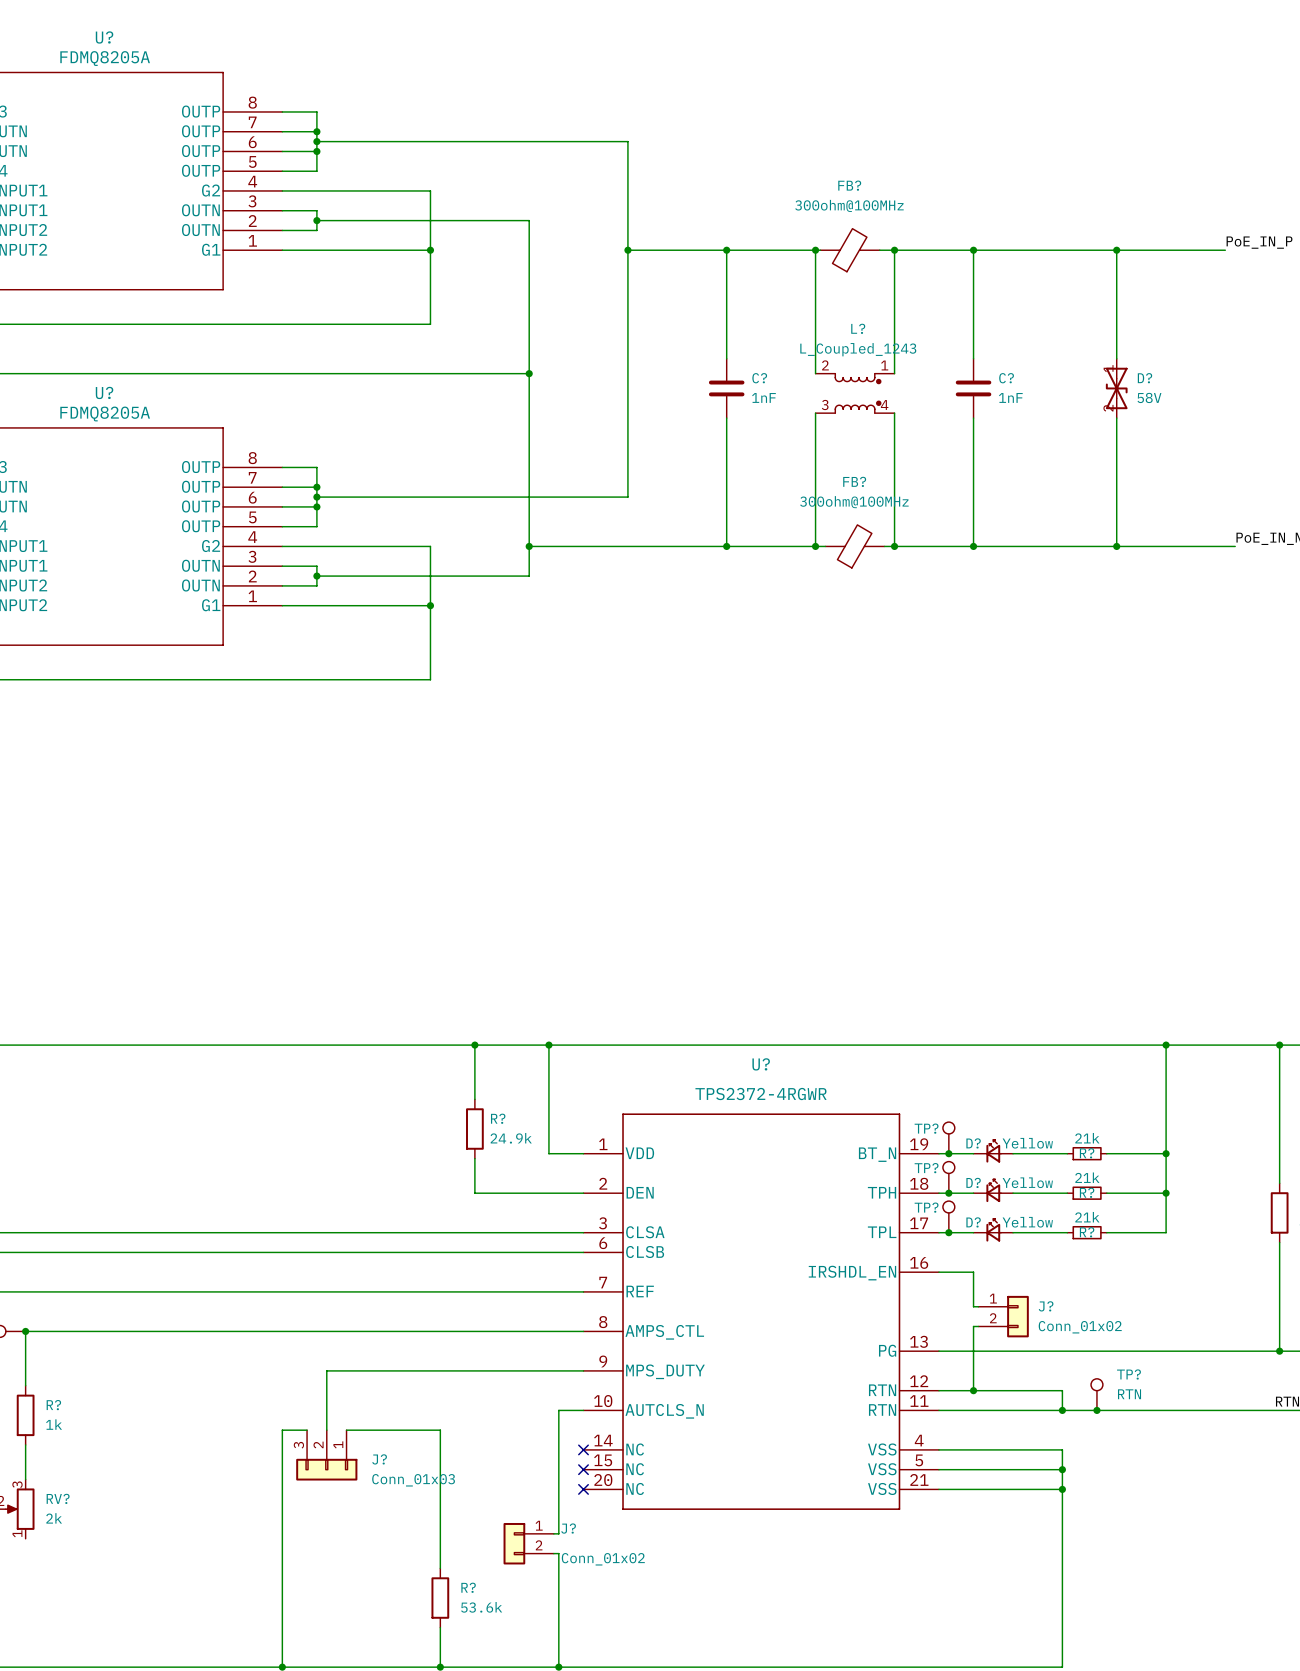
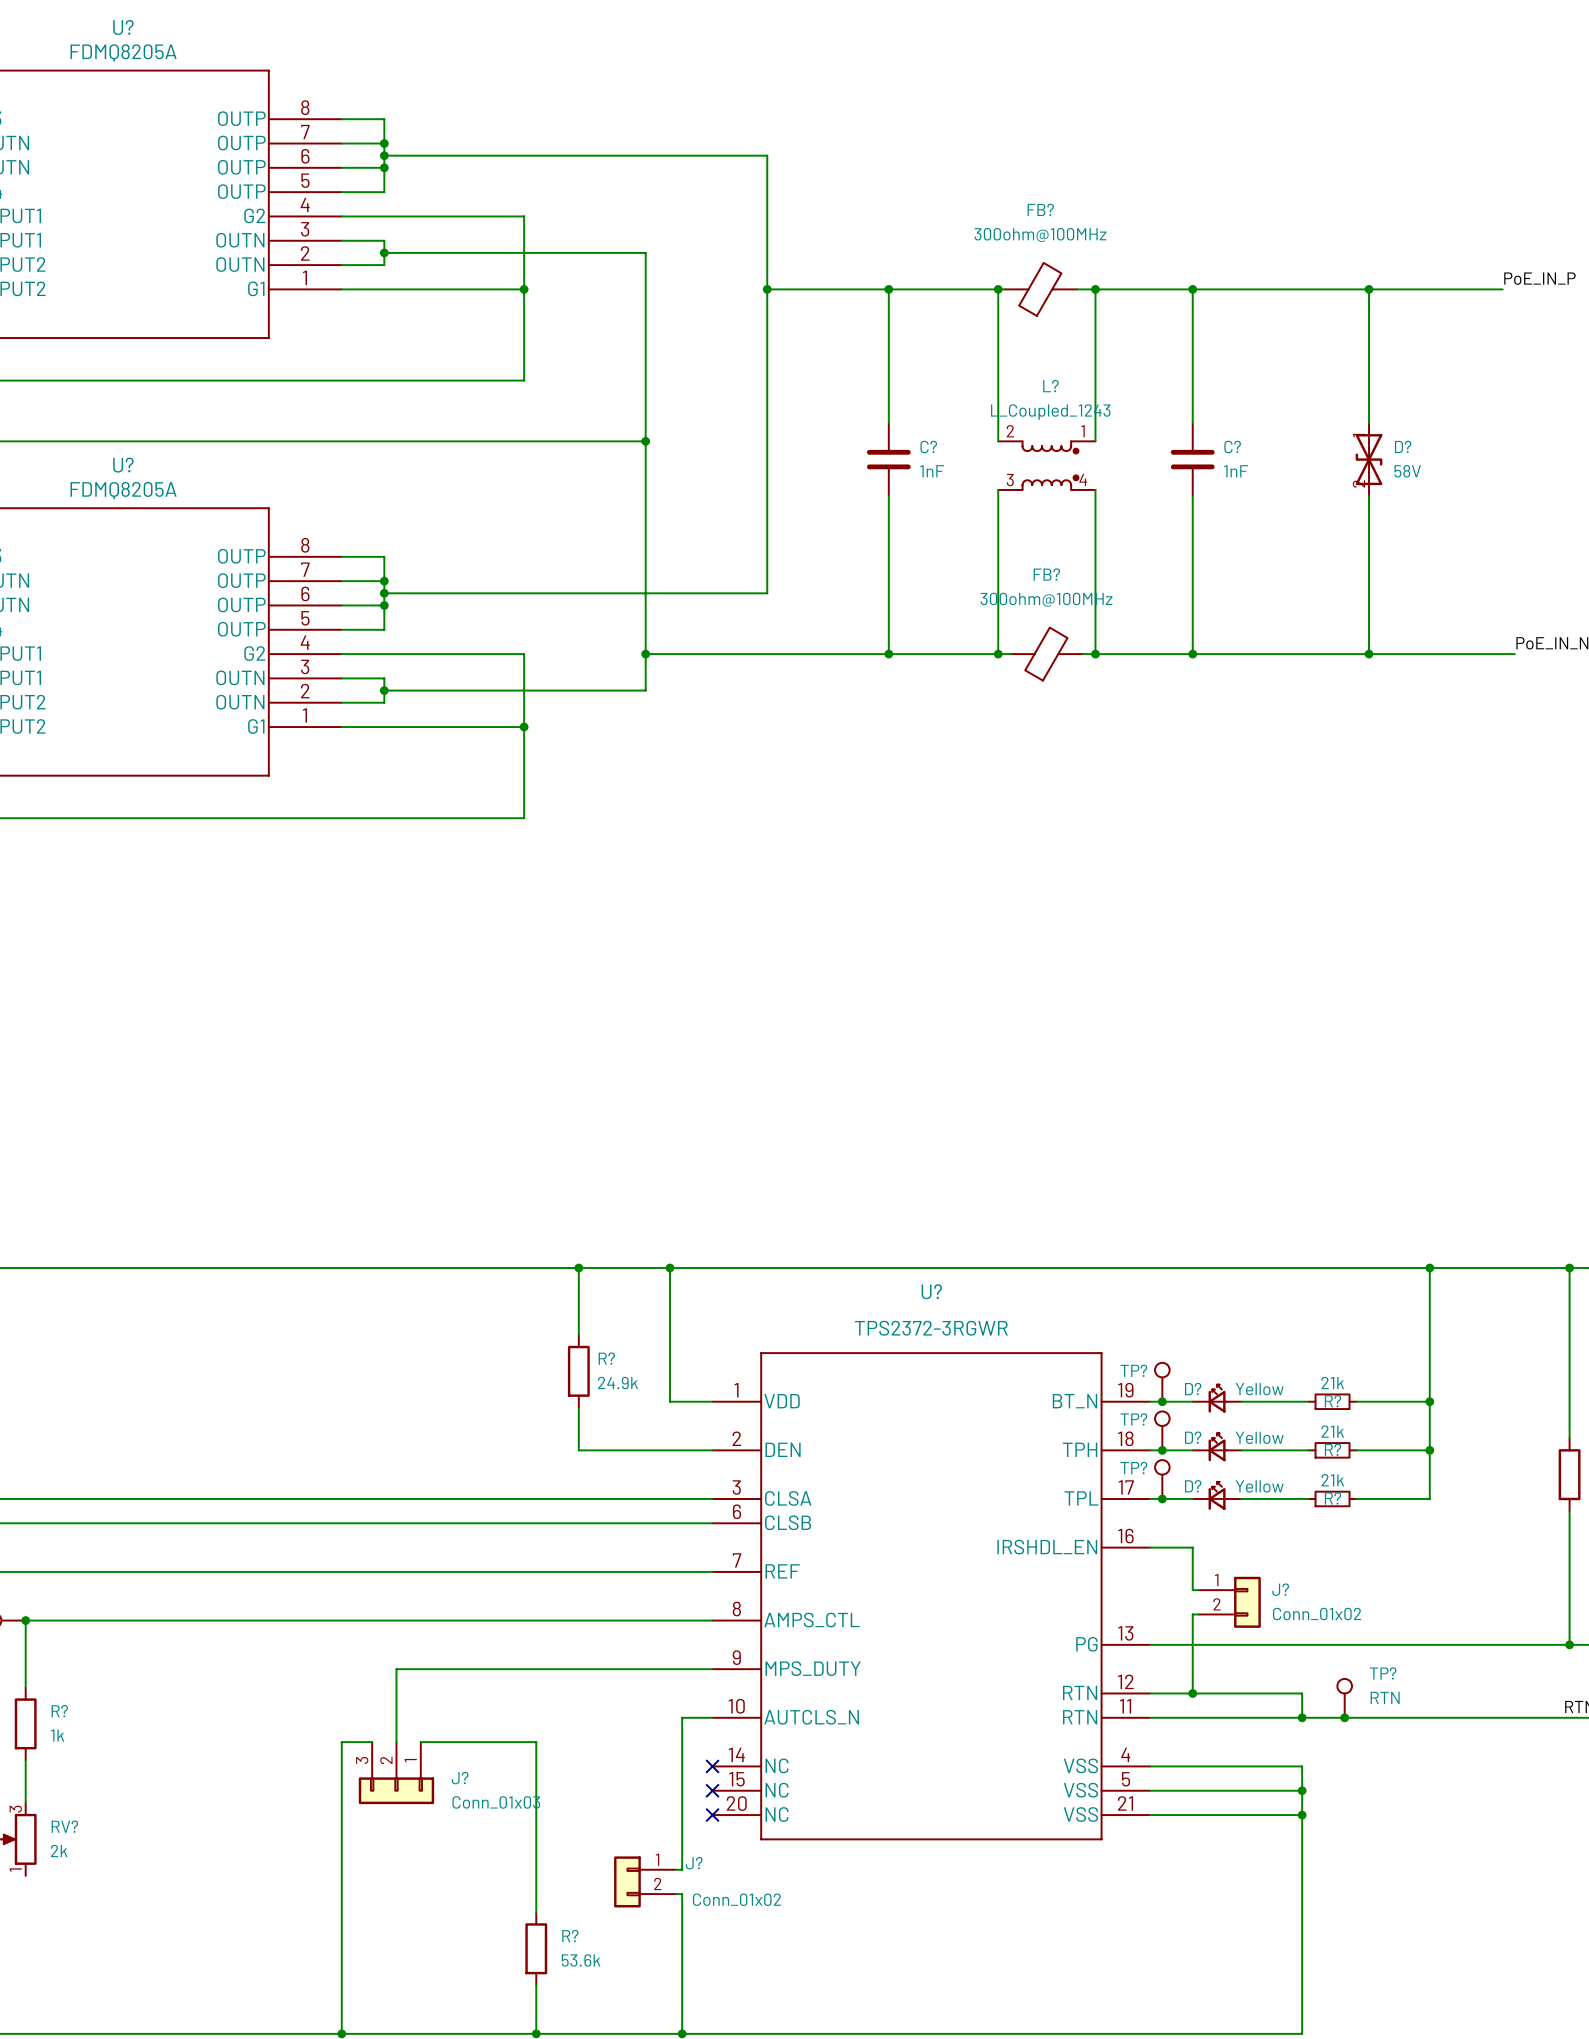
U? value: TPS2372-4RGWR (761, 1094) -> TPS2372-3RGWR (931, 1328)

